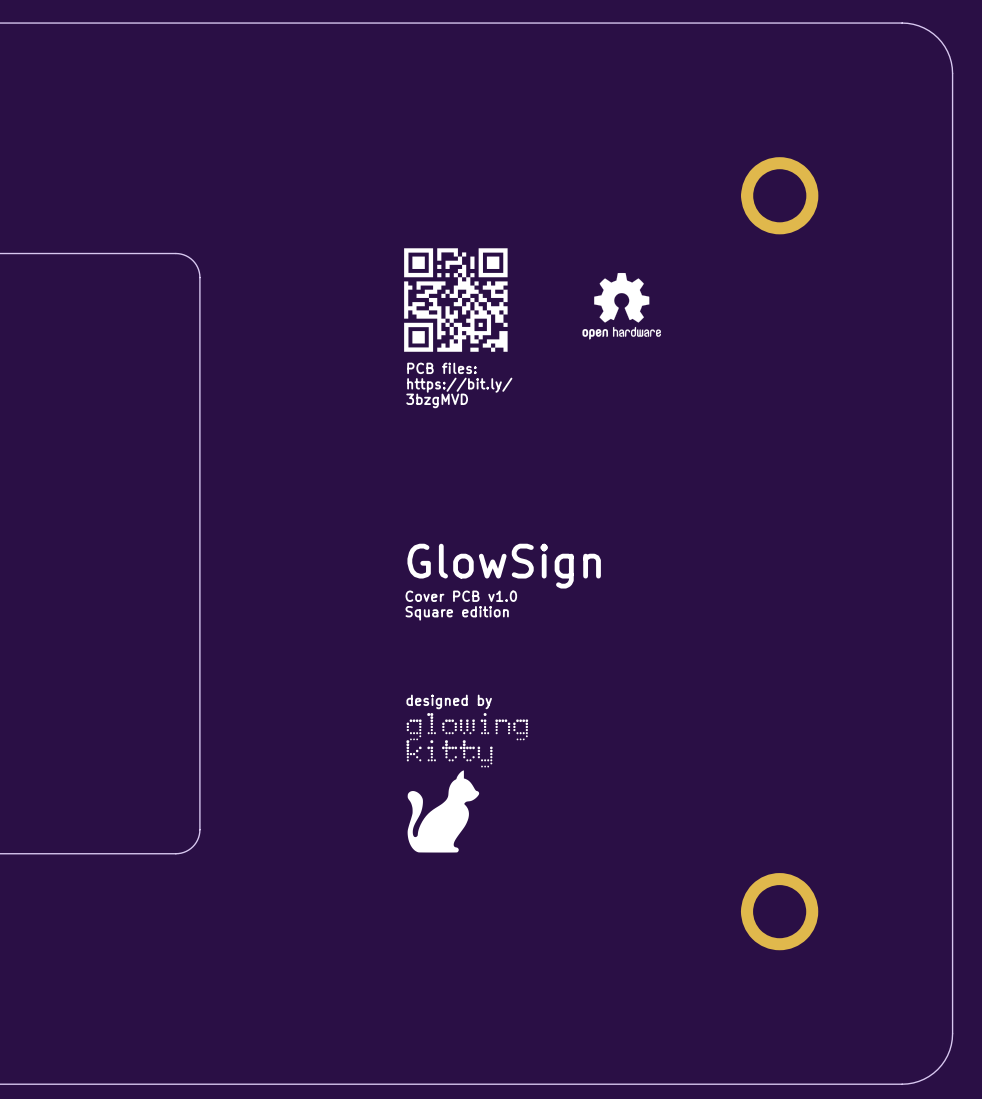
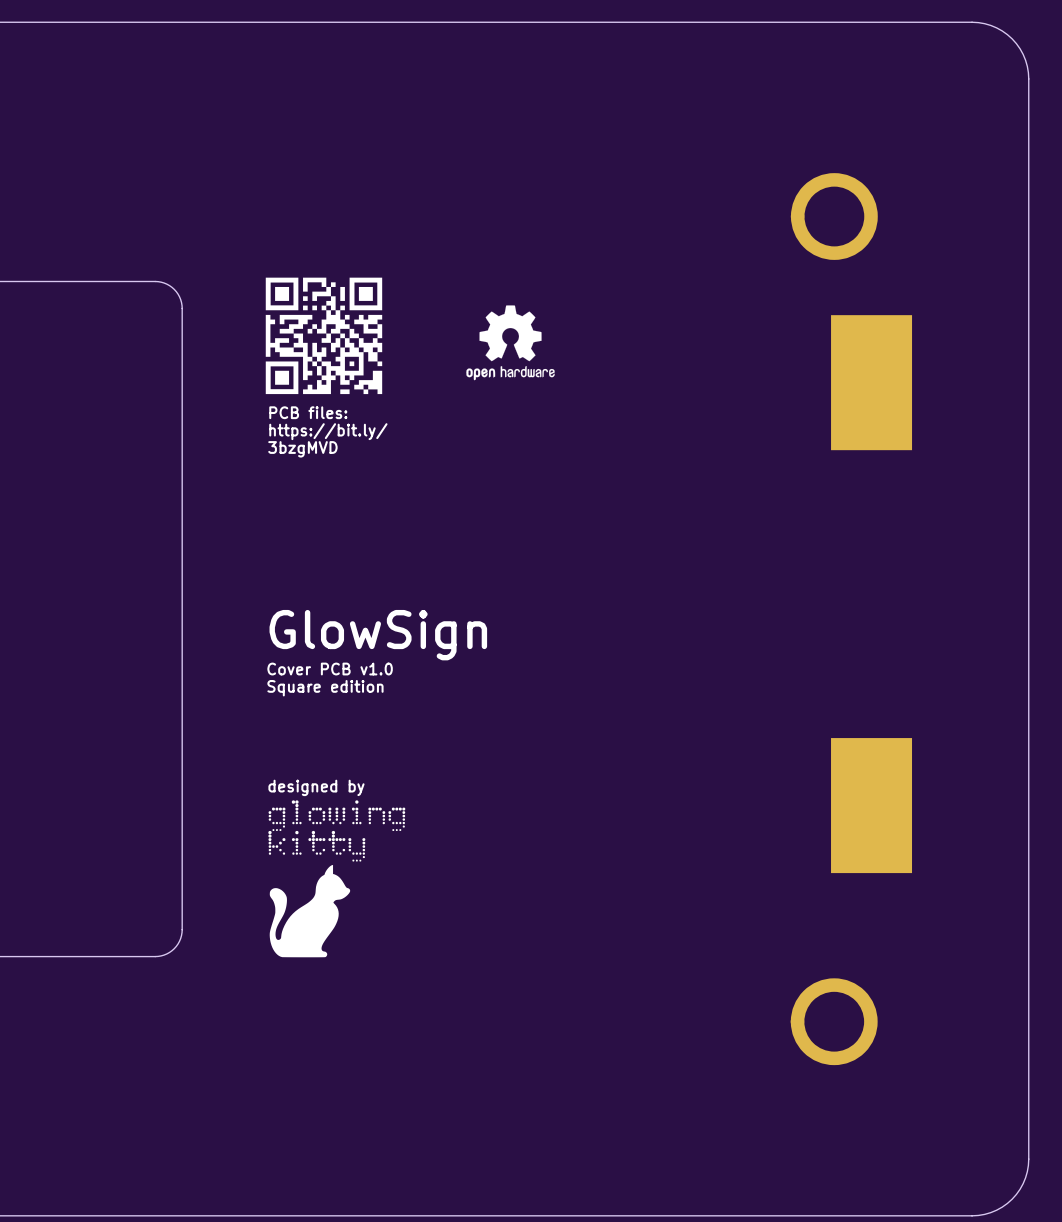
drawing position: (455, 300) -> (323, 335)
drawing position: (621, 306) -> (510, 342)
part: none -> (871, 382)
text position: PCB files: (441, 368) -> PCB files: (308, 412)
text position: https://bit.ly/ (459, 385) -> https://bit.ly/ (328, 431)
text position: 3bzgMVD (437, 400) -> 3bzgMVD (302, 449)
text position: GlowSign (504, 566) -> GlowSign (378, 635)
text position: Cover PCB v1.0 (461, 596) -> Cover PCB v1.0 (330, 669)
text position: Square edition (457, 613) -> Square edition (325, 688)
text position: designed by (449, 701) -> designed by (316, 787)
part: none -> (871, 805)
drawing position: (467, 782) -> (336, 878)

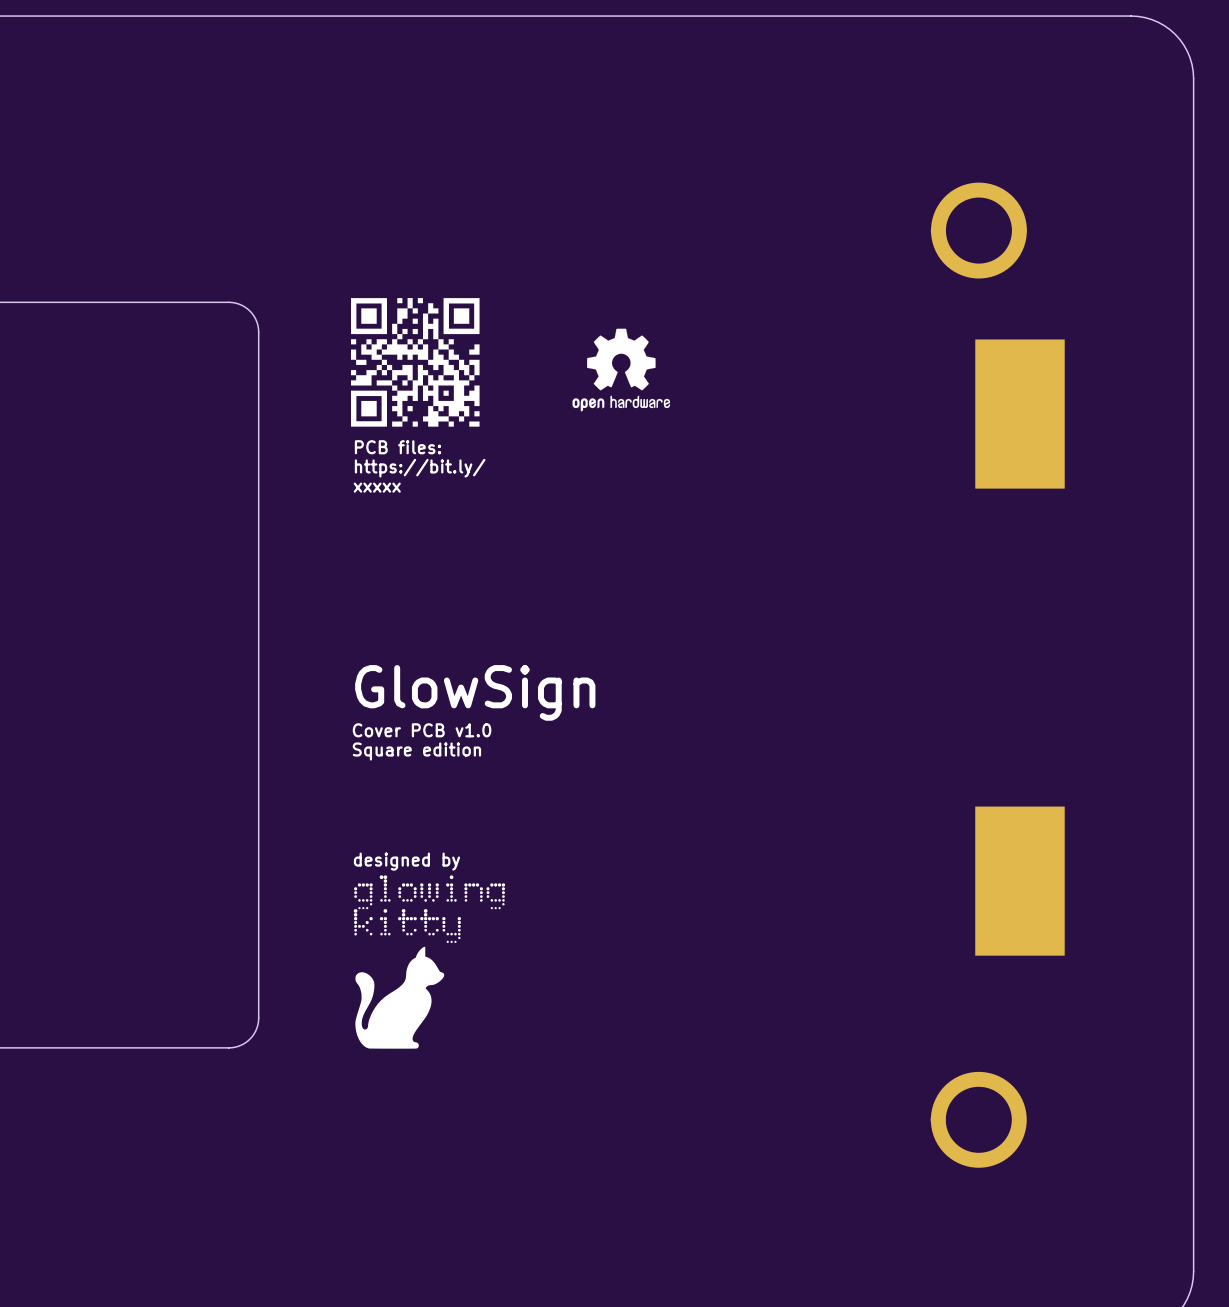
drawing shape: [265, 277, 383, 395] -> [350, 298, 480, 427]
text: 3bzgMVD (302, 449) -> xxxxx (377, 487)

